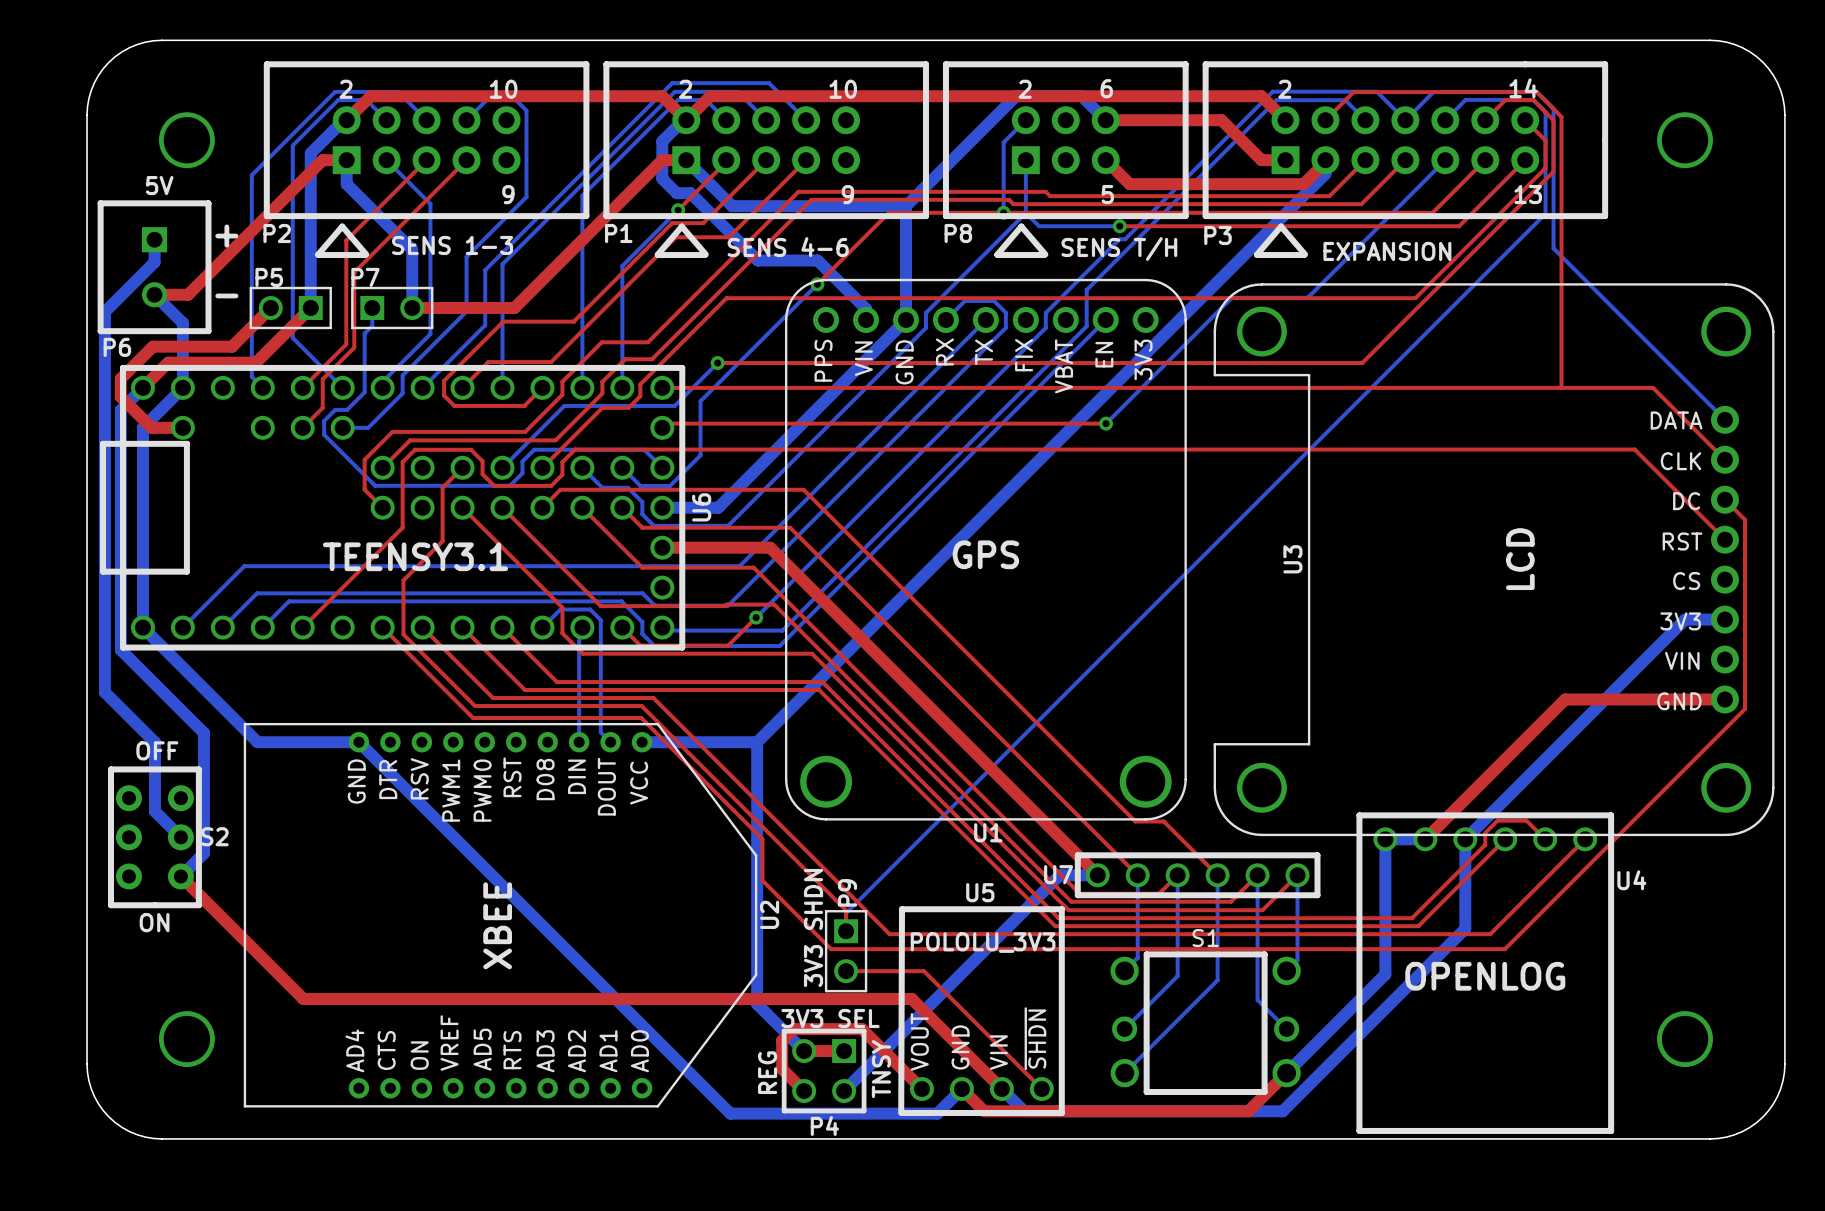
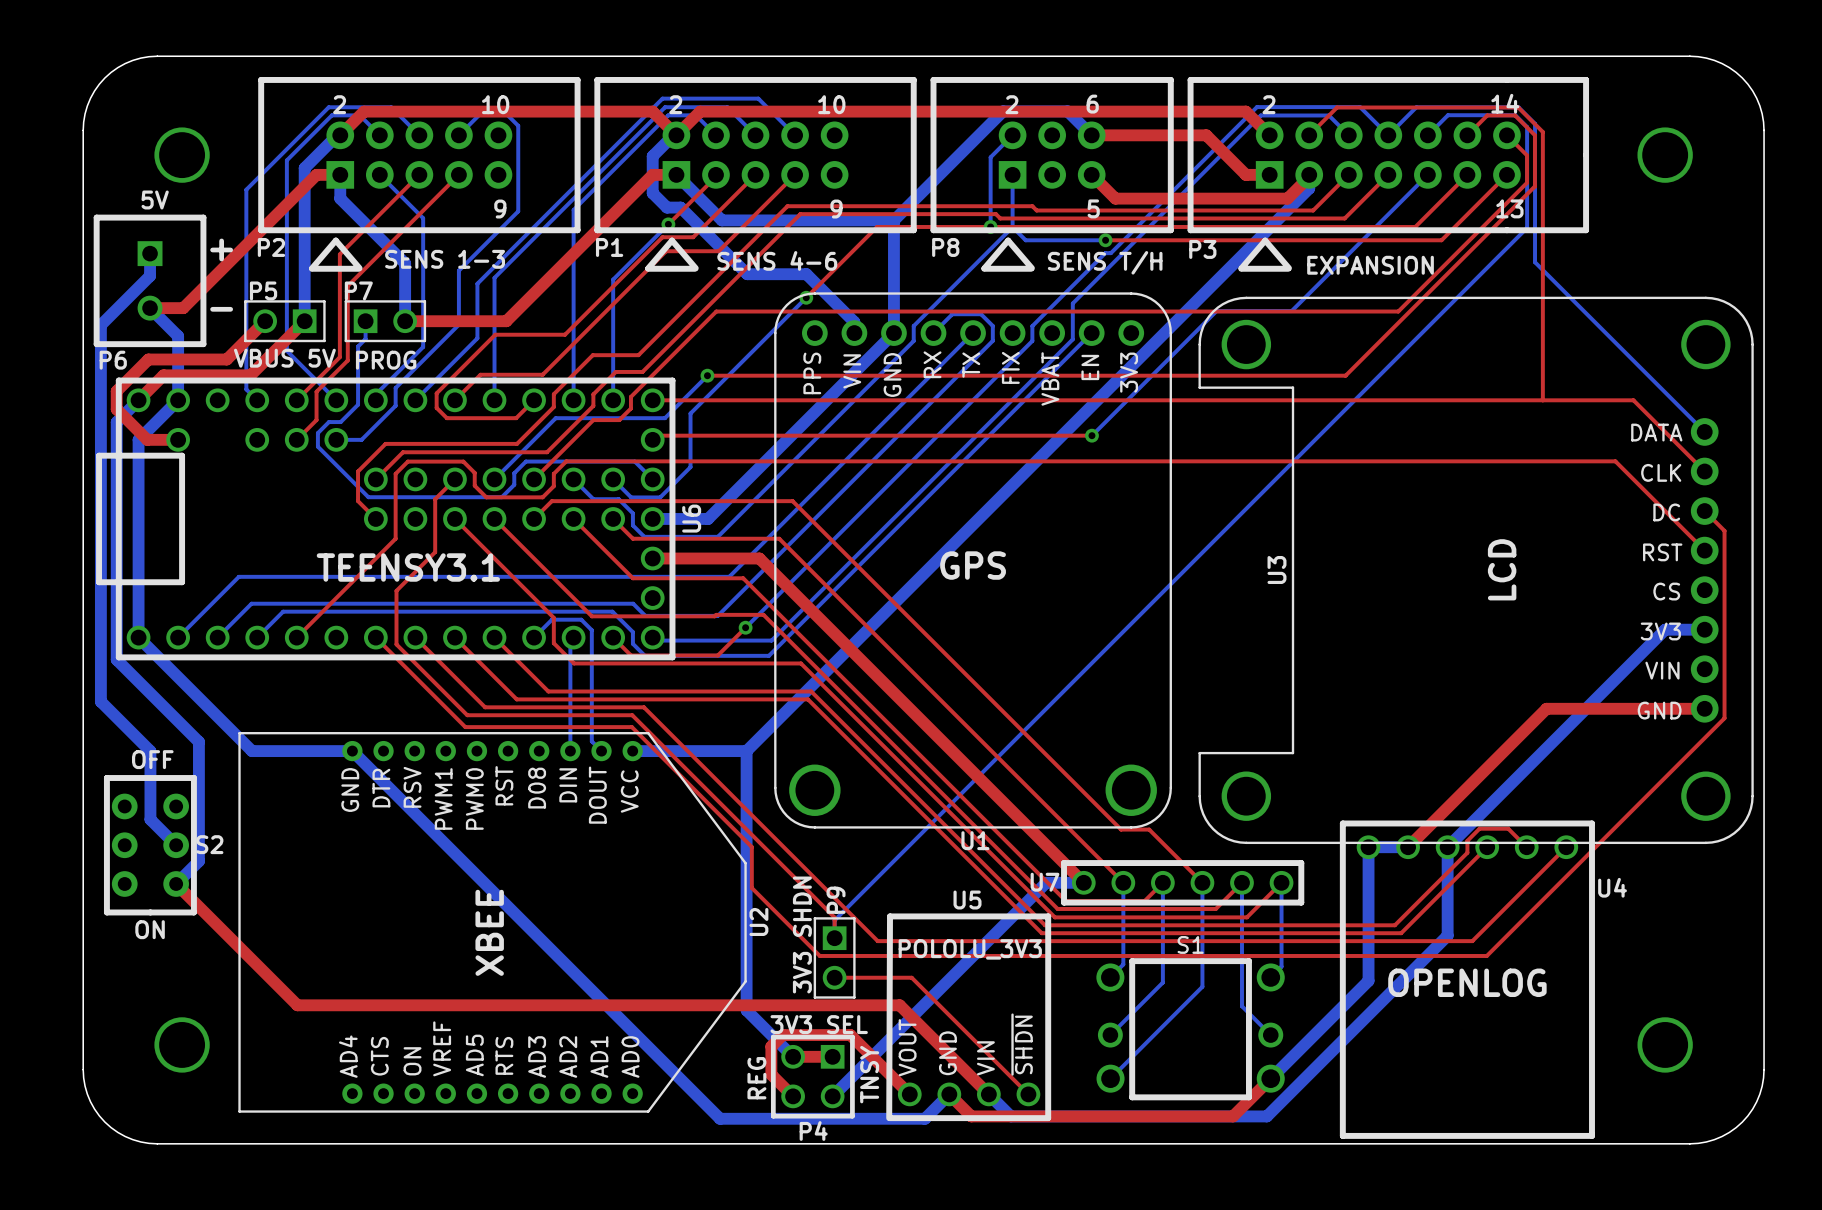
text: none -> VBUS 5V (284, 358)
text: none -> PROG (386, 360)

